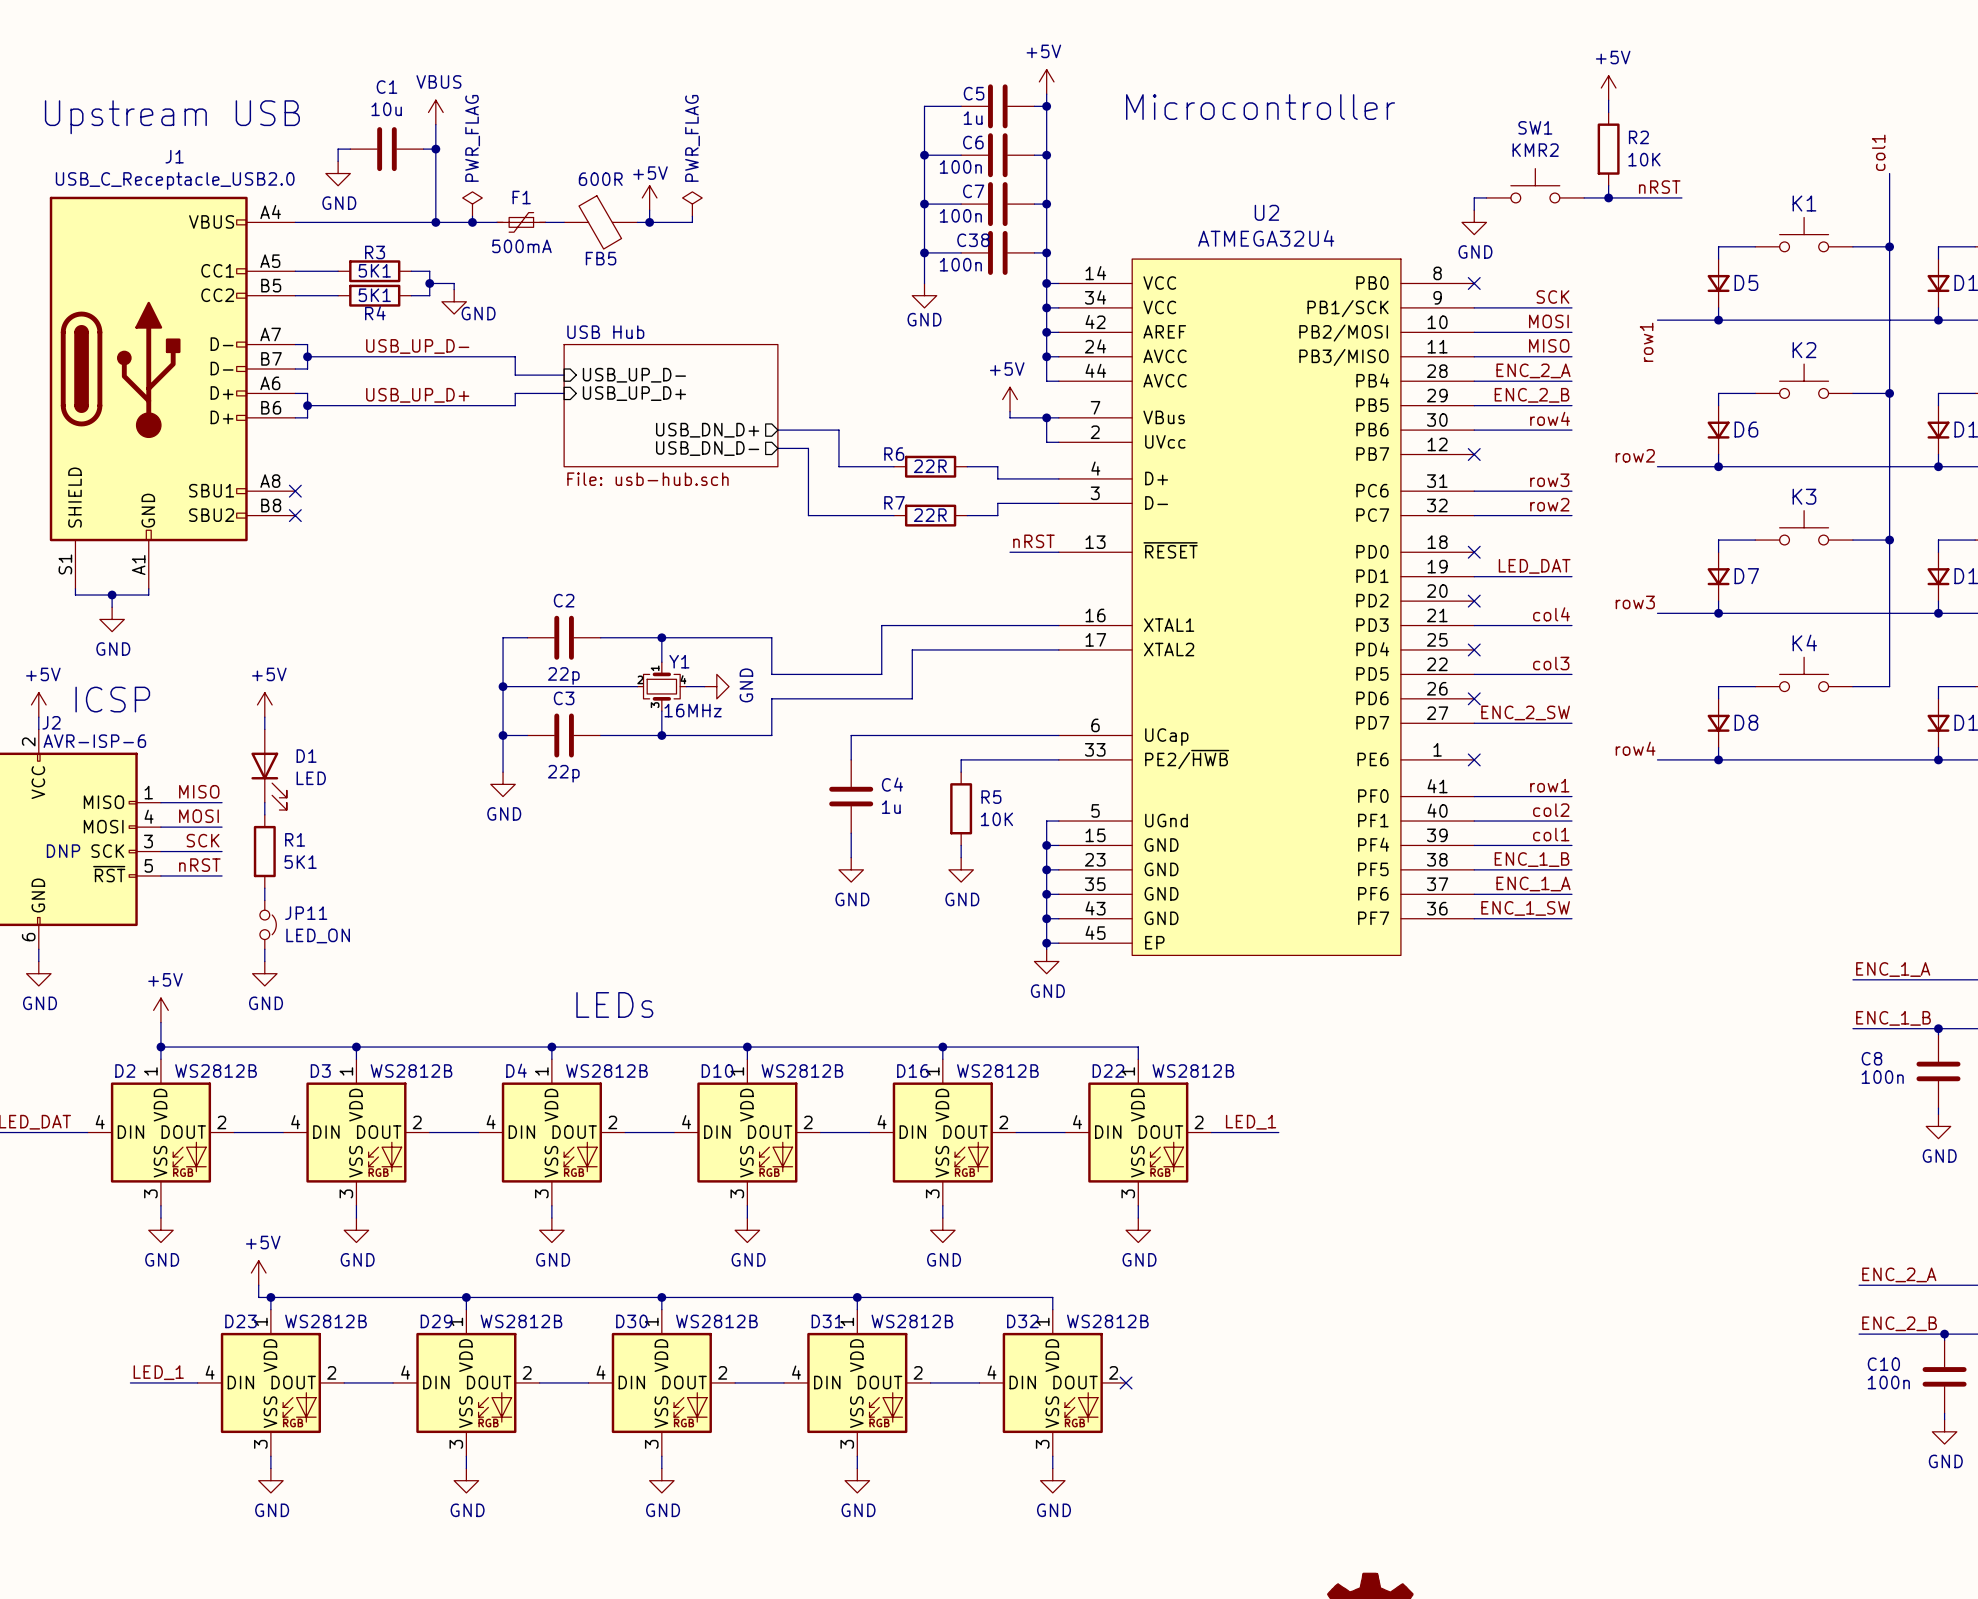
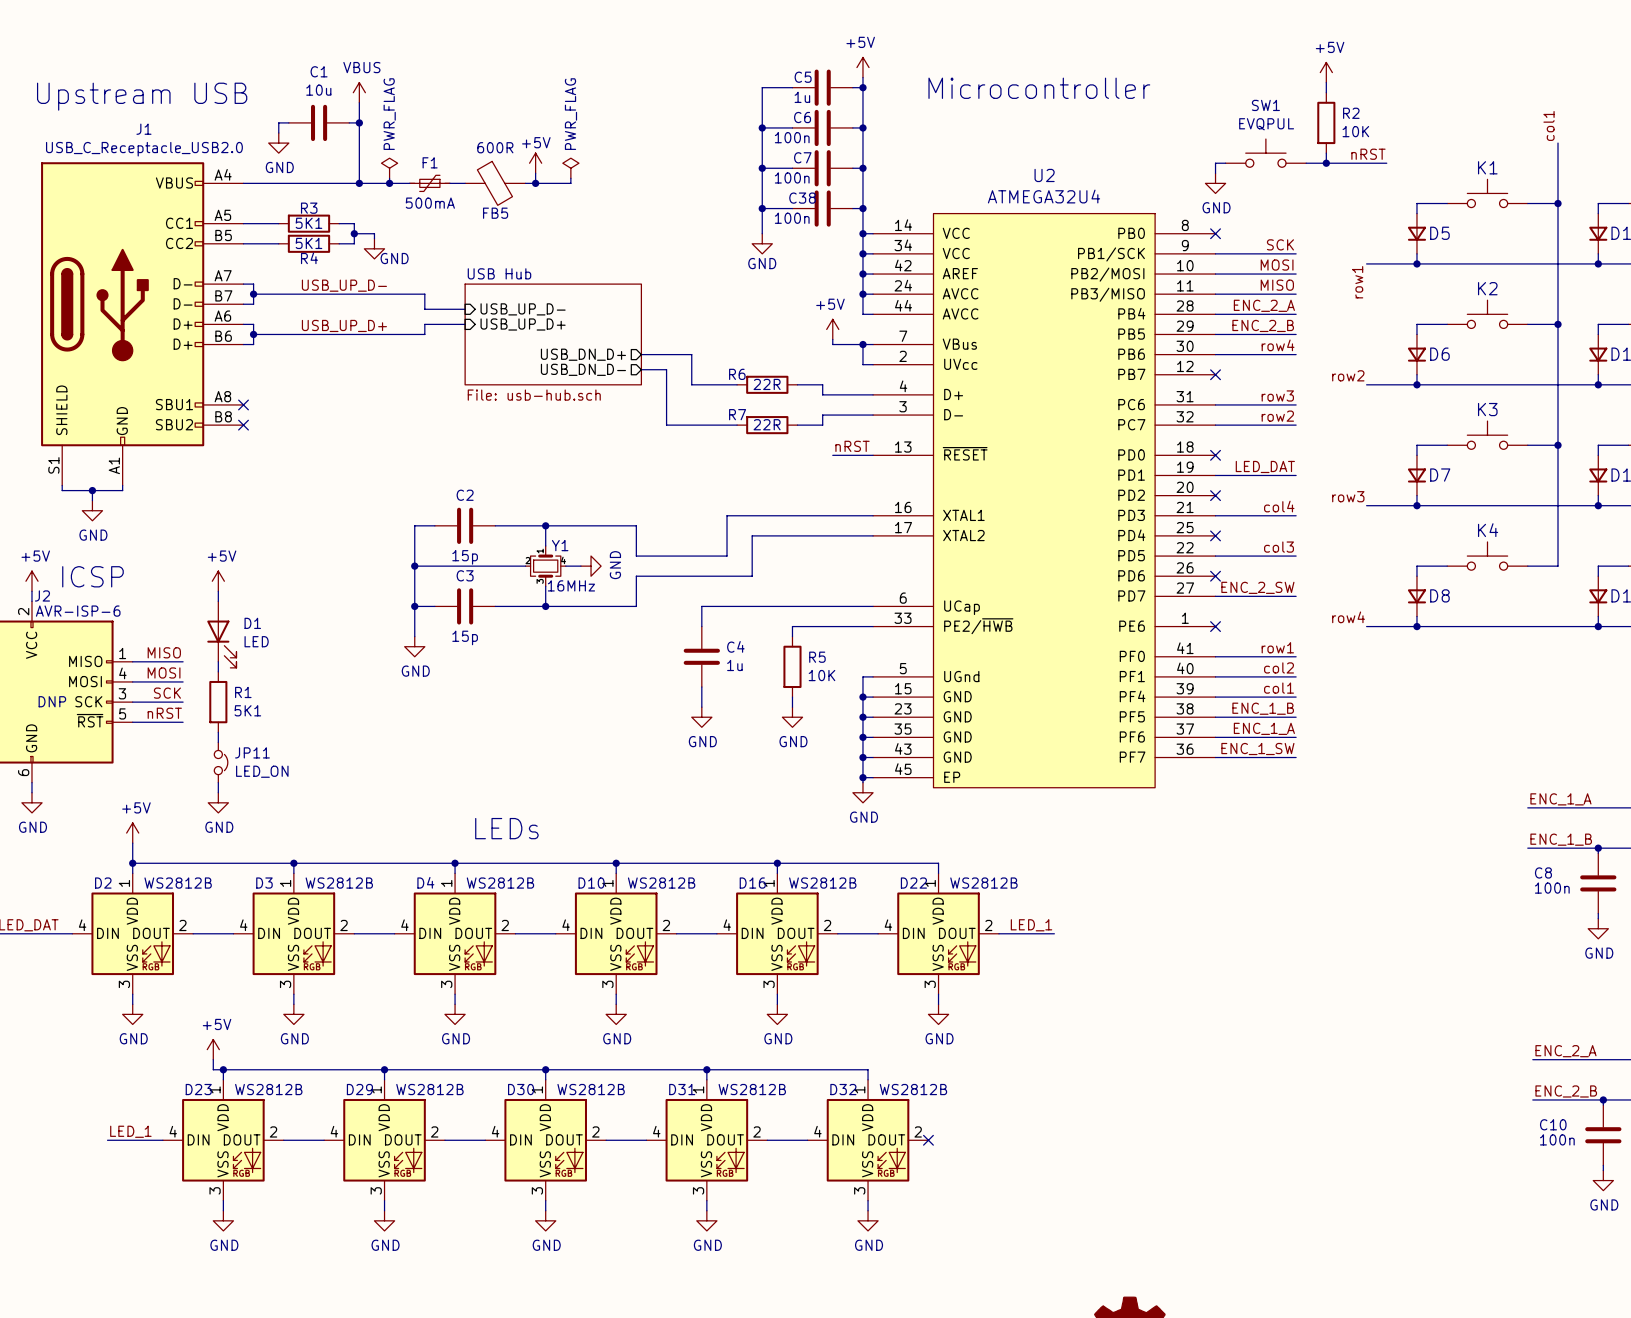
SW1 value: KMR2 (1535, 150) -> EVQPUL (1266, 124)
C2 value: 22p (563, 675) -> 15p (465, 557)
C3 value: 22p (563, 773) -> 15p (465, 637)

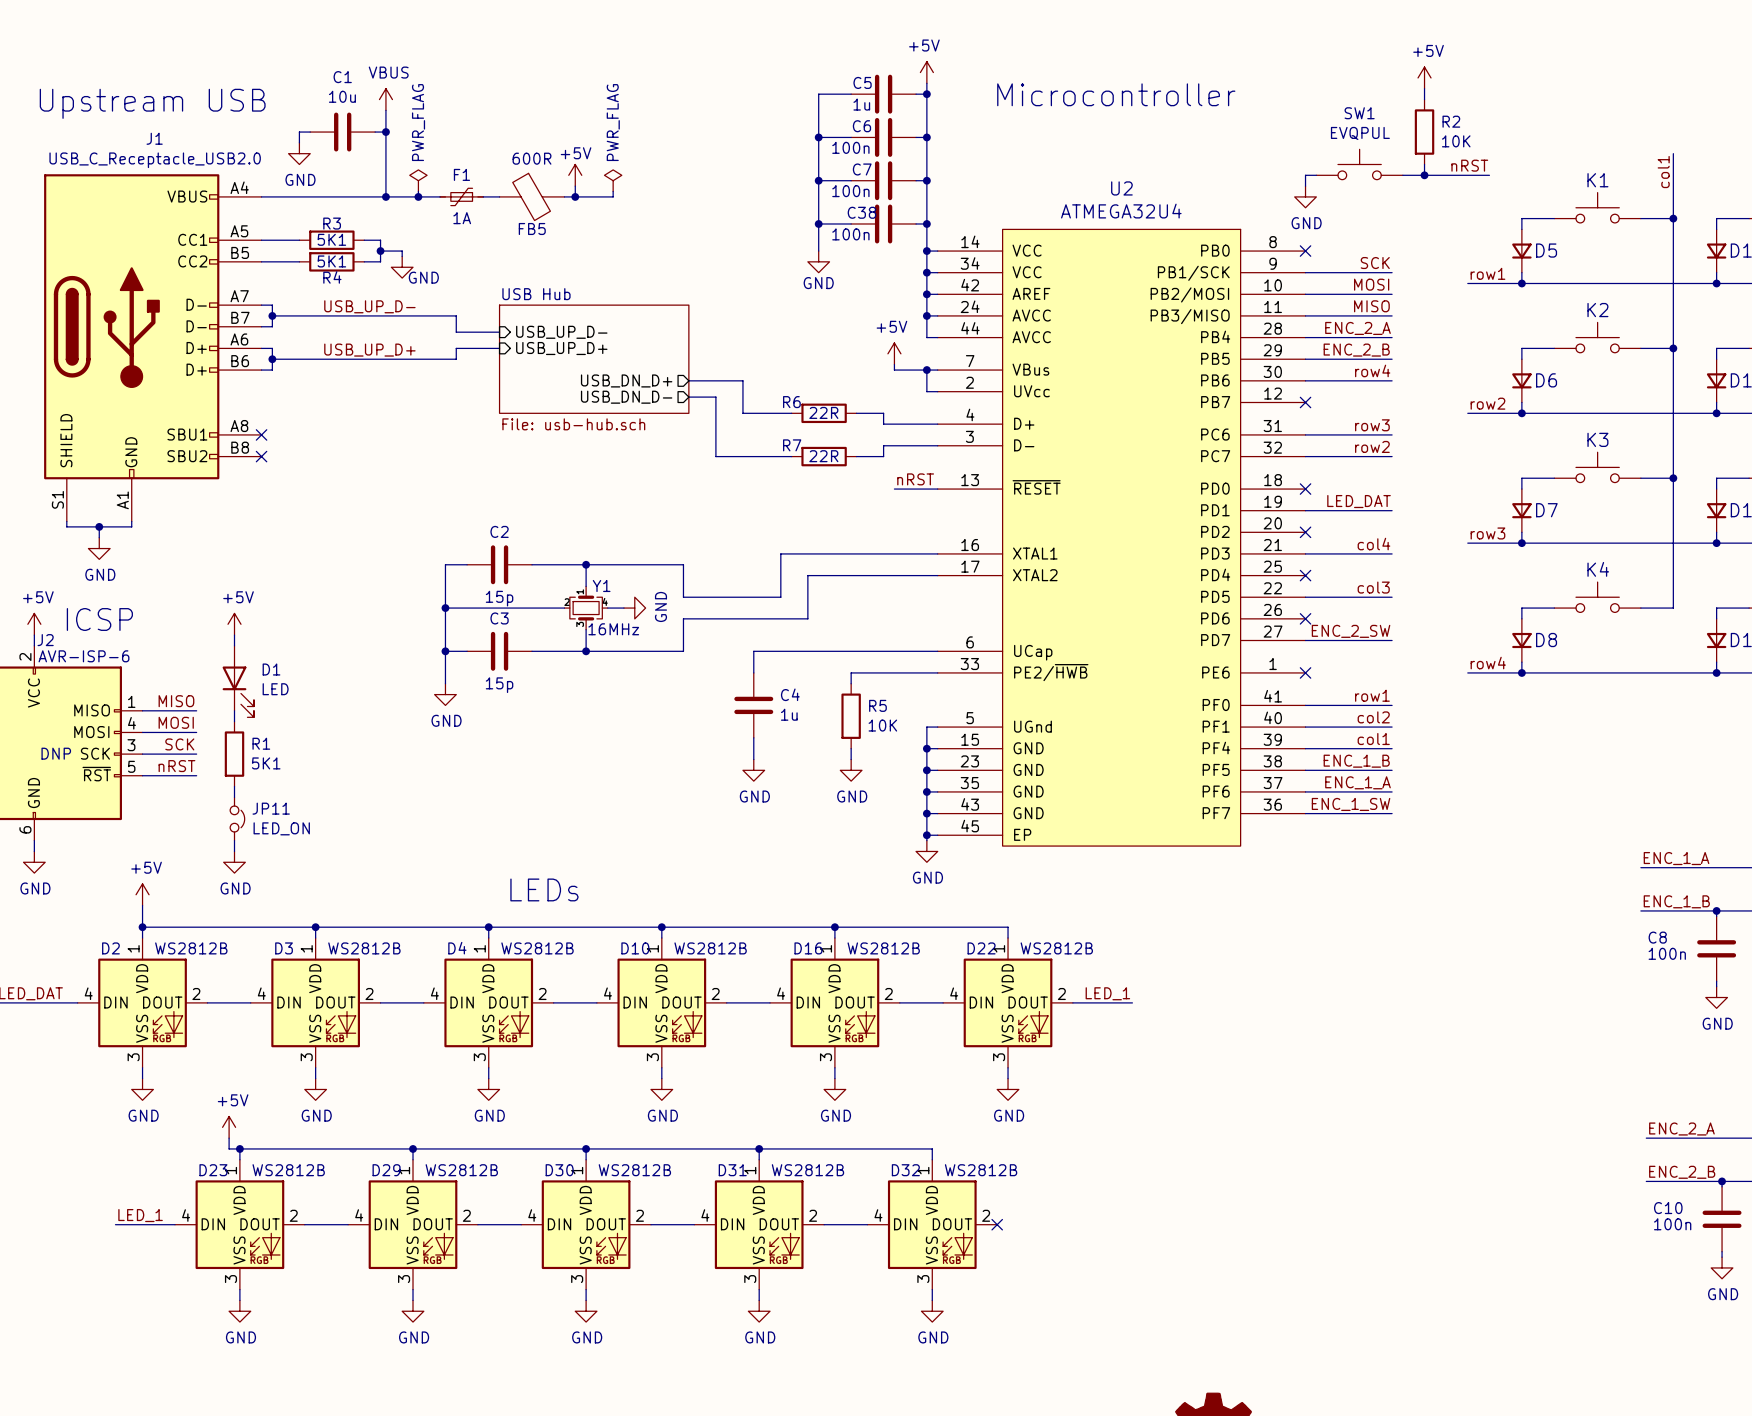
label position: col1 (1549, 125) -> col1 (1663, 172)
F1 value: 500mA (430, 203) -> 1A (462, 218)
label rotation: 0° (1357, 282) -> 90° clockwise (1487, 273)
label position: row2 (1348, 375) -> row2 (1487, 403)
label position: row3 (1348, 496) -> row3 (1487, 533)
label position: row4 (1348, 617) -> row4 (1488, 663)

